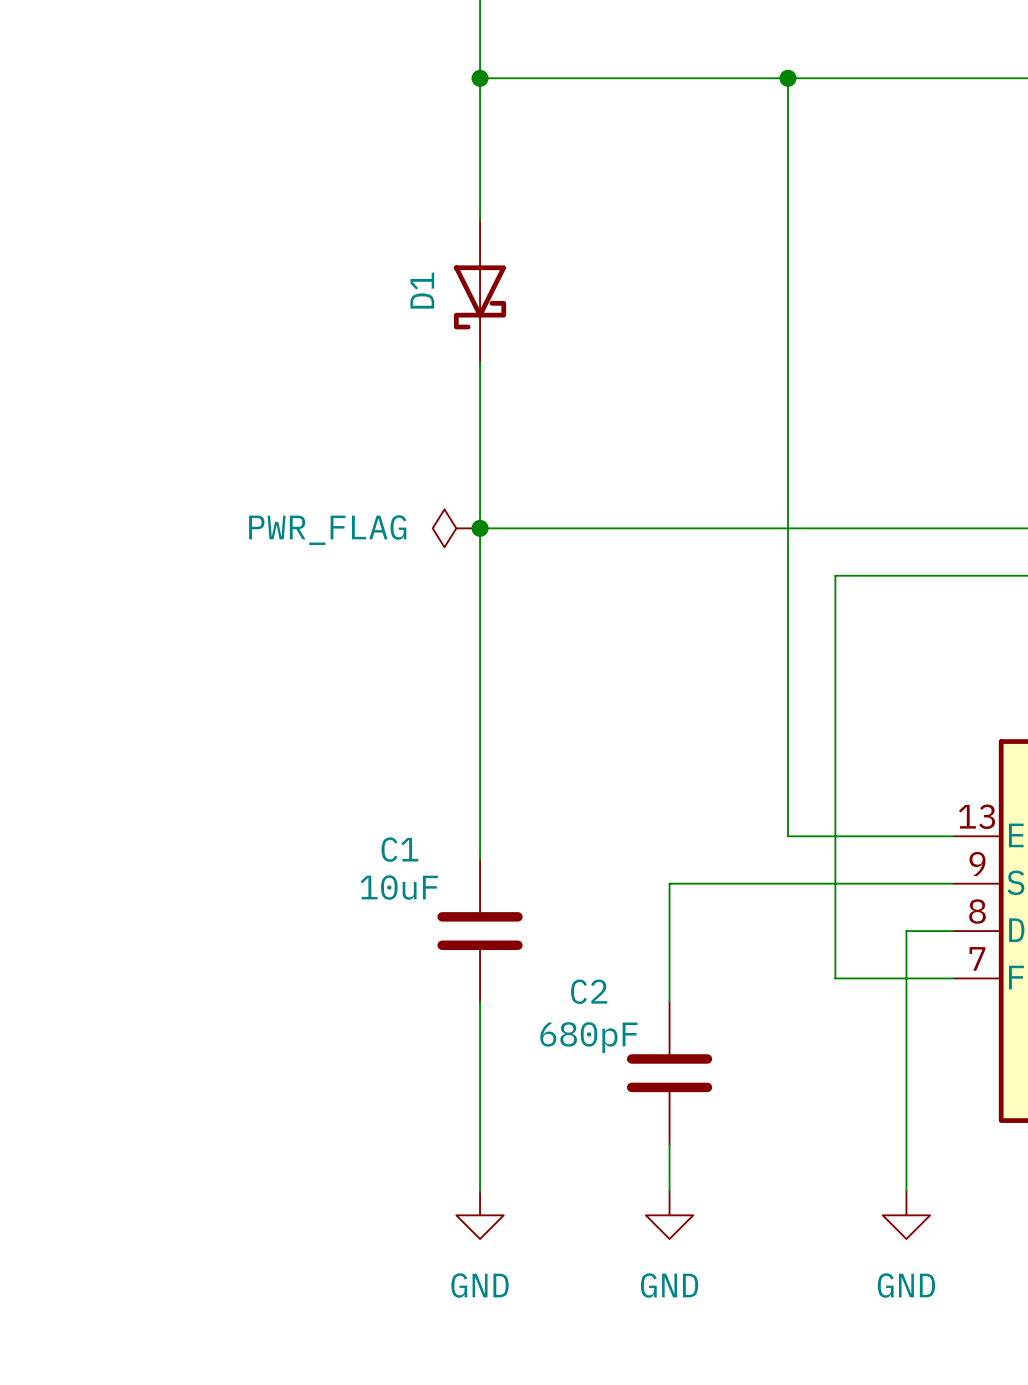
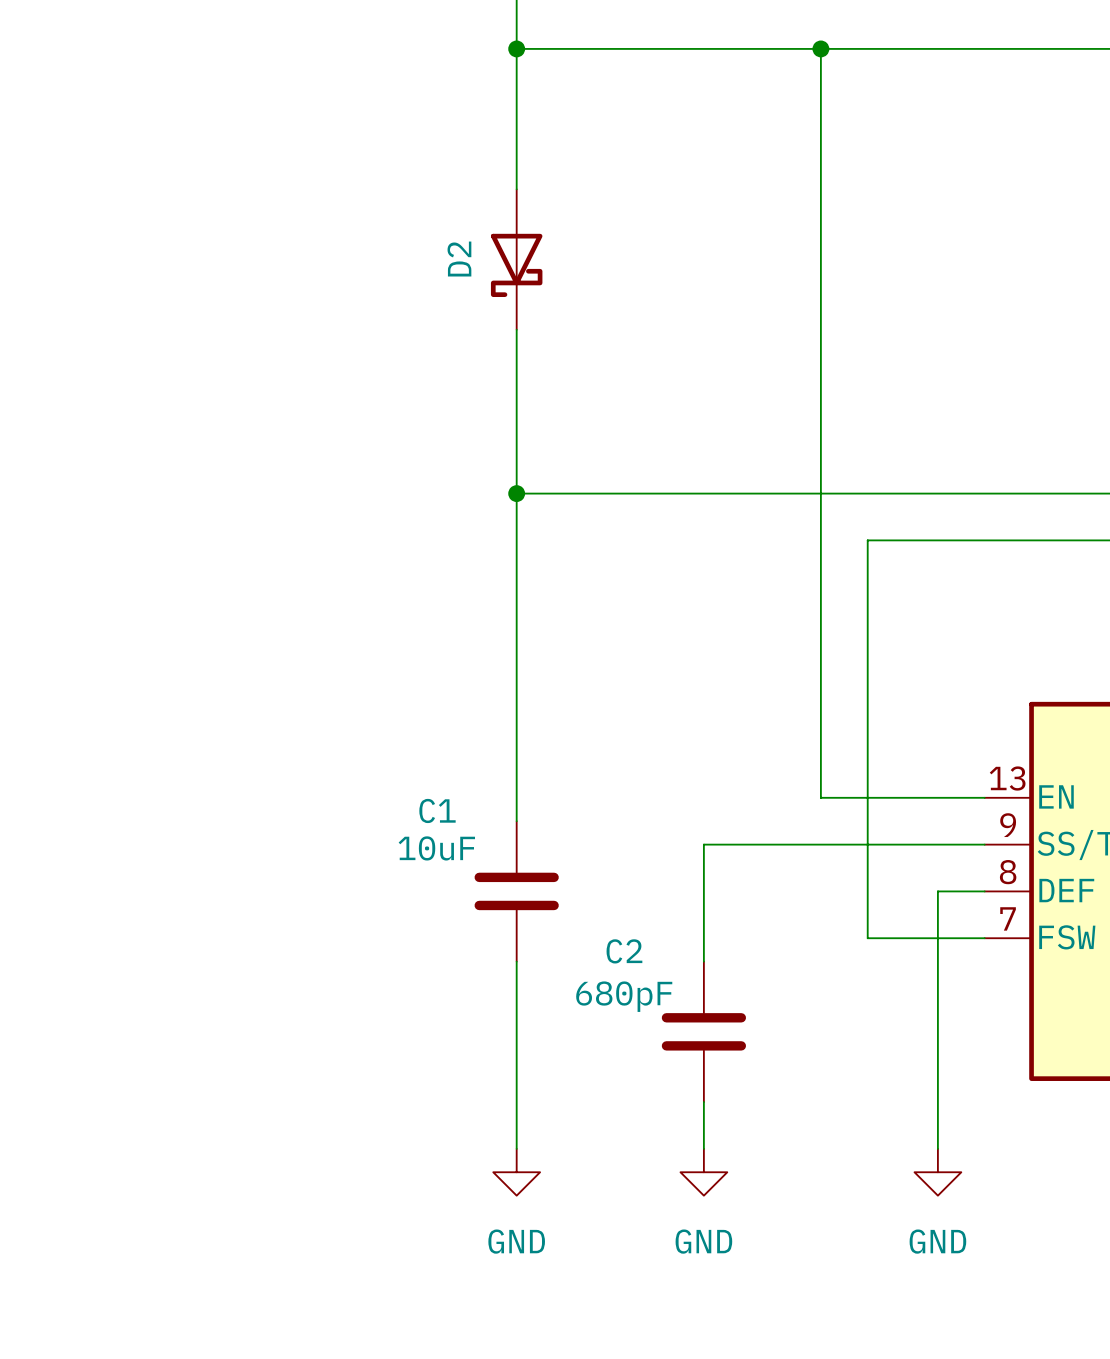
D1 name: D1 (422, 290) -> D2 (459, 259)
power symbol: PWR_FLAG (456, 528) -> none

